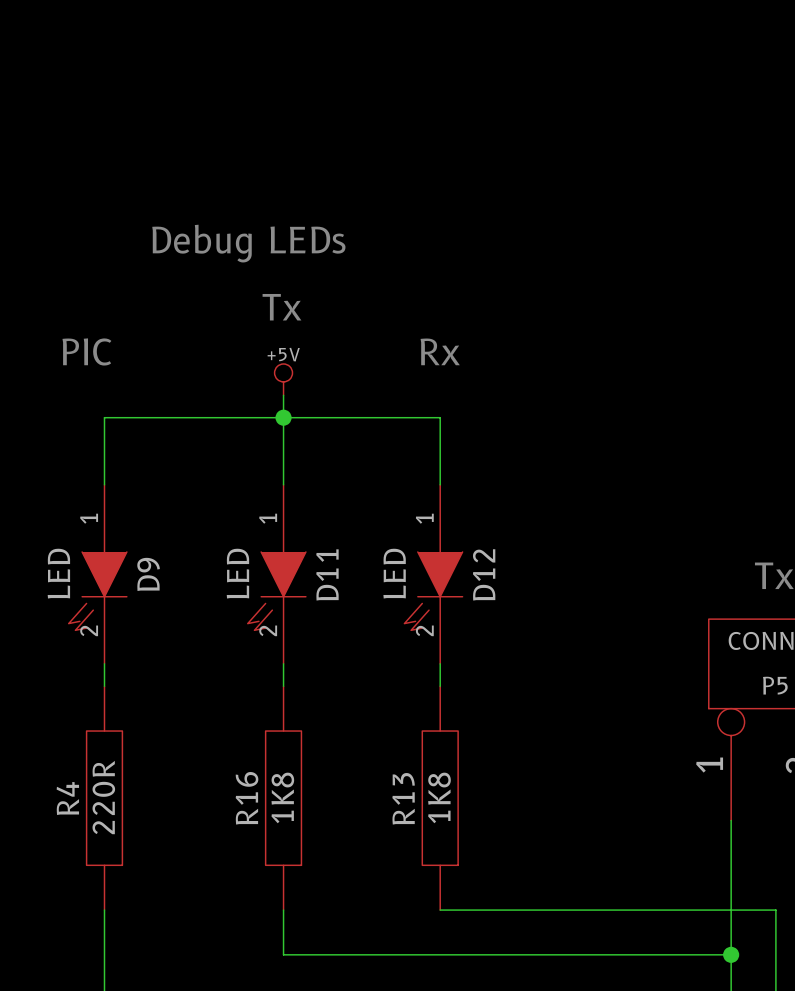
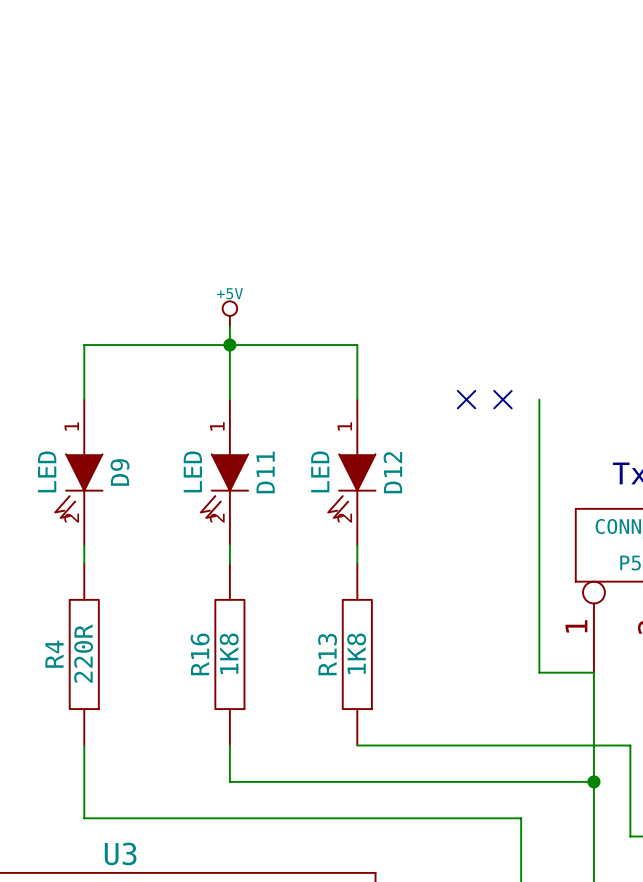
text: Debug LEDs (248, 243) -> none
text: Tx (281, 307) -> none
text: PIC (86, 351) -> none
text: Rx (440, 351) -> none
no-connect mark: none -> (466, 399)
no-connect mark: none -> (502, 399)
wire: none -> (539, 399) (539, 672) (593, 672)

